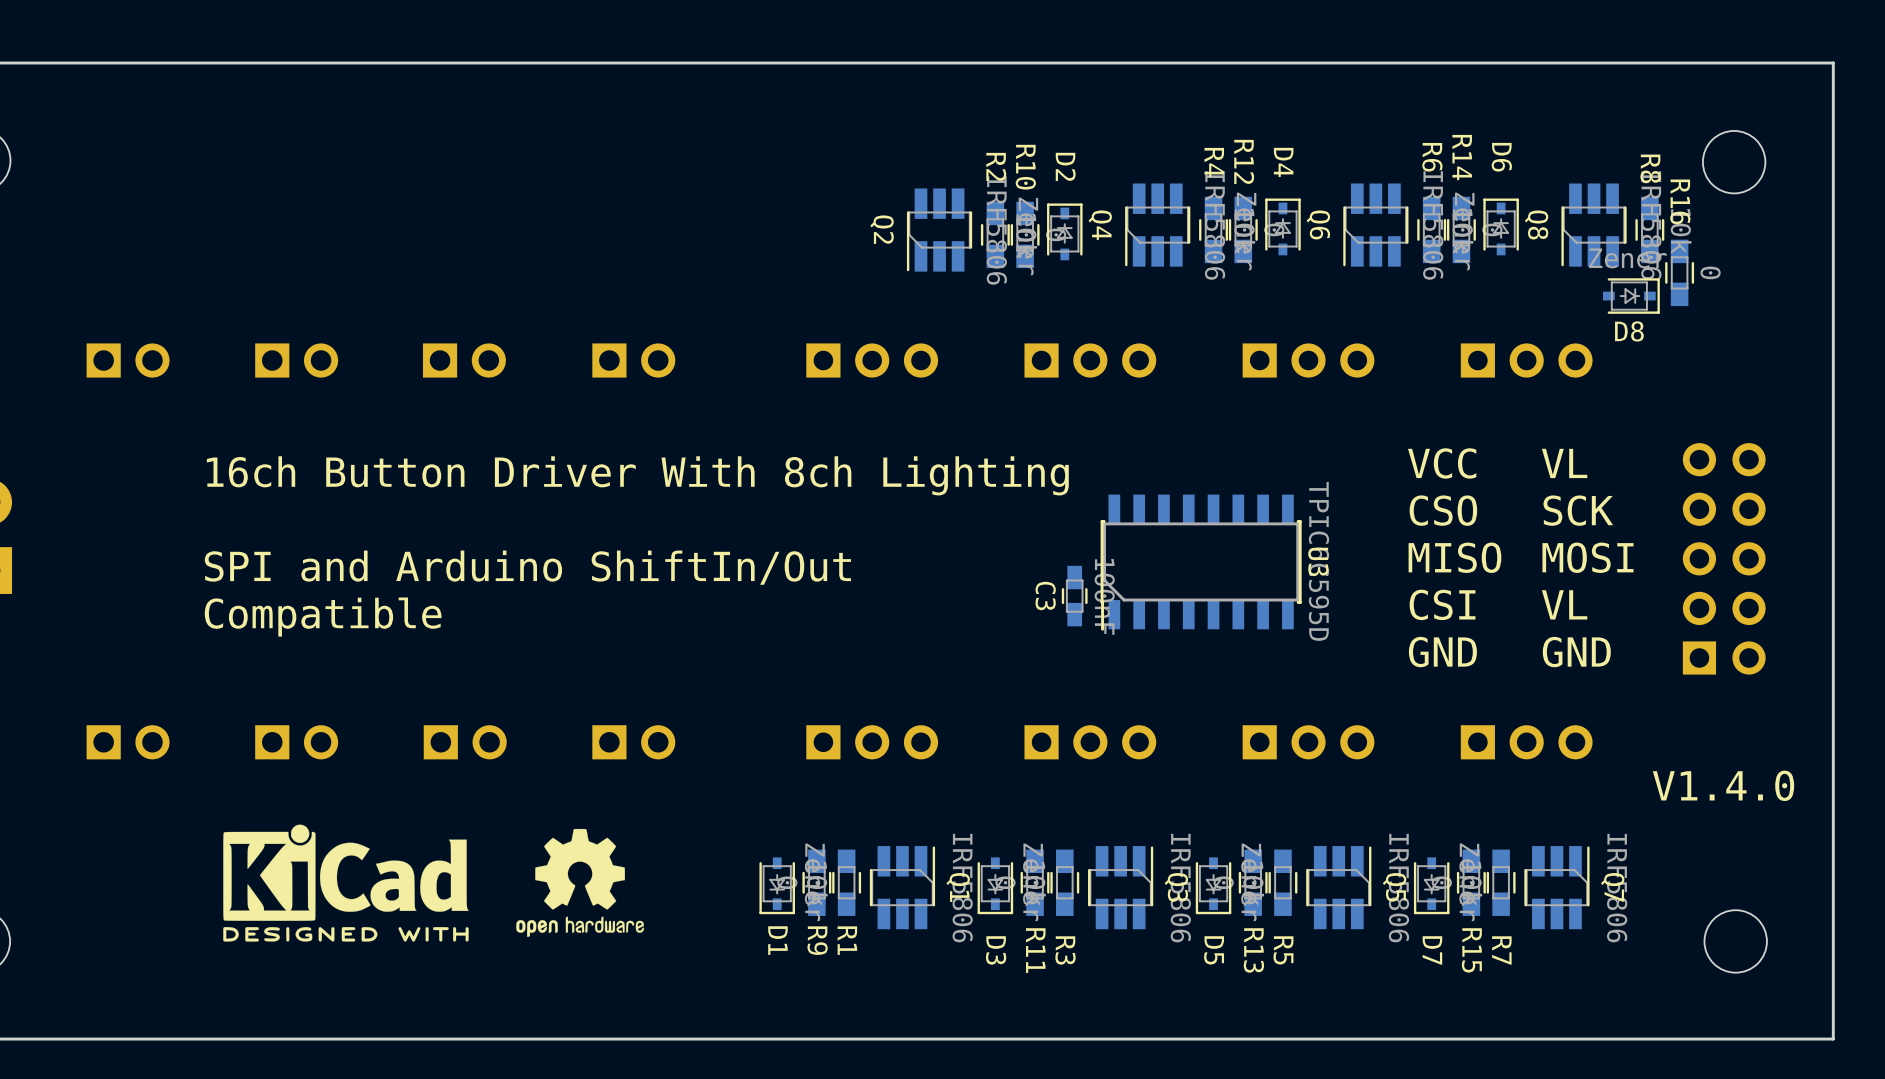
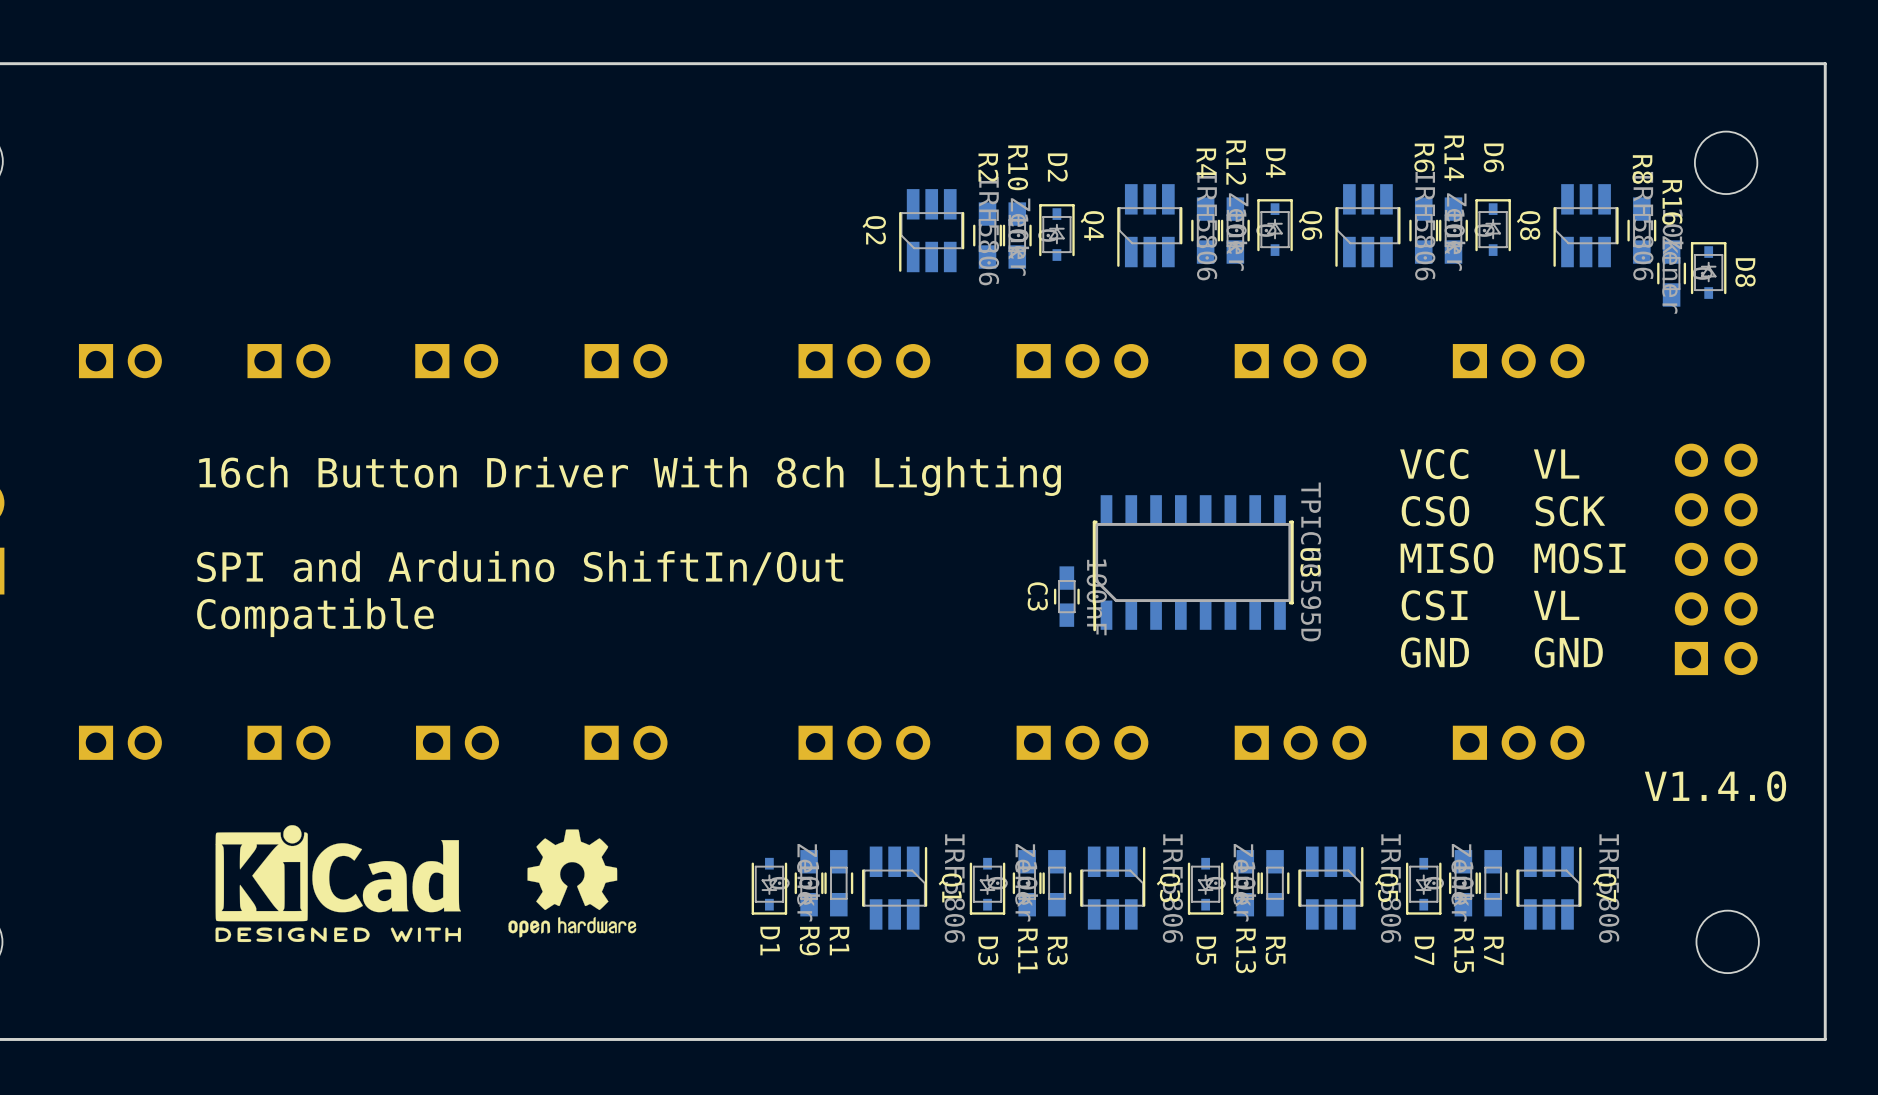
D8 rotation: 0° (1631, 296) -> 90° counterclockwise (1708, 270)
D8 position: (1631, 296) -> (1708, 270)

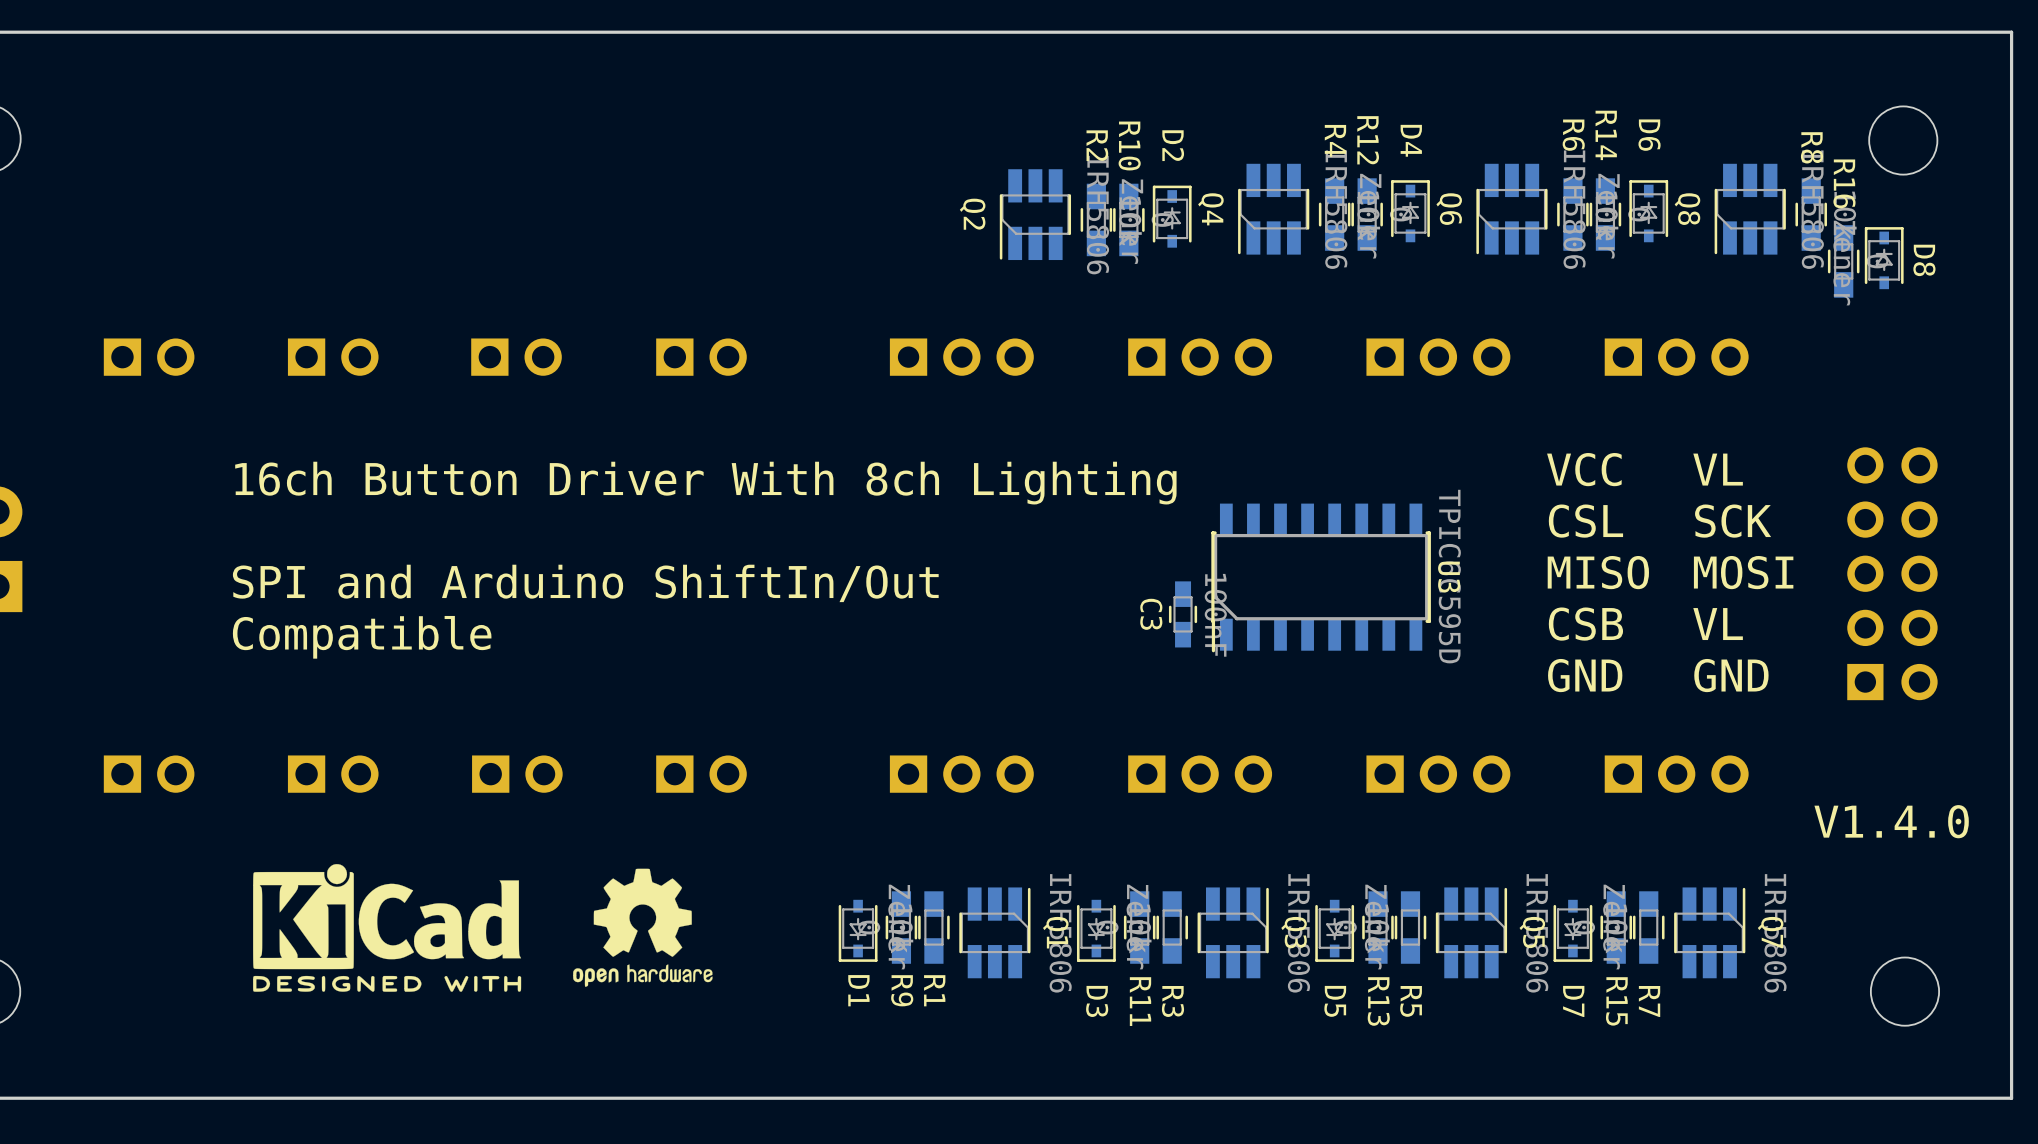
text: CSO (1435, 511) -> CSL (1585, 521)
text: CSI (1434, 605) -> CSB (1585, 624)

